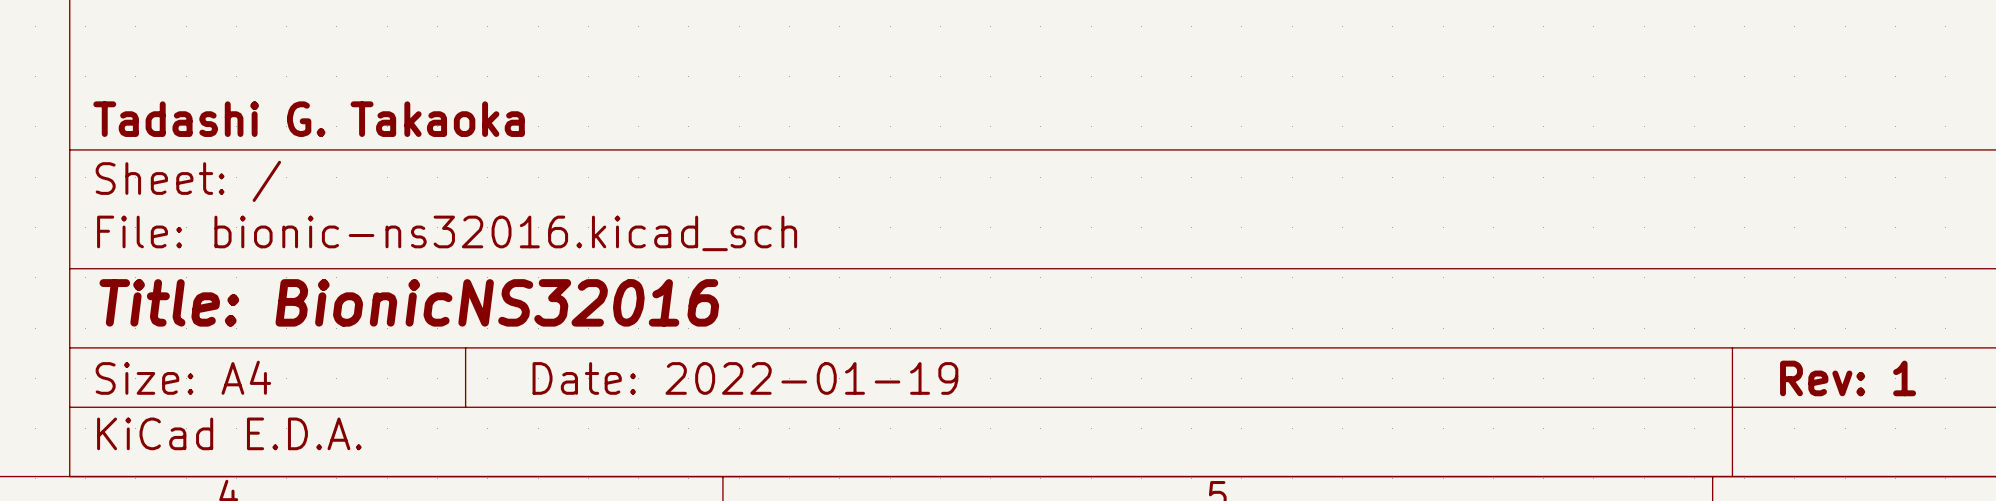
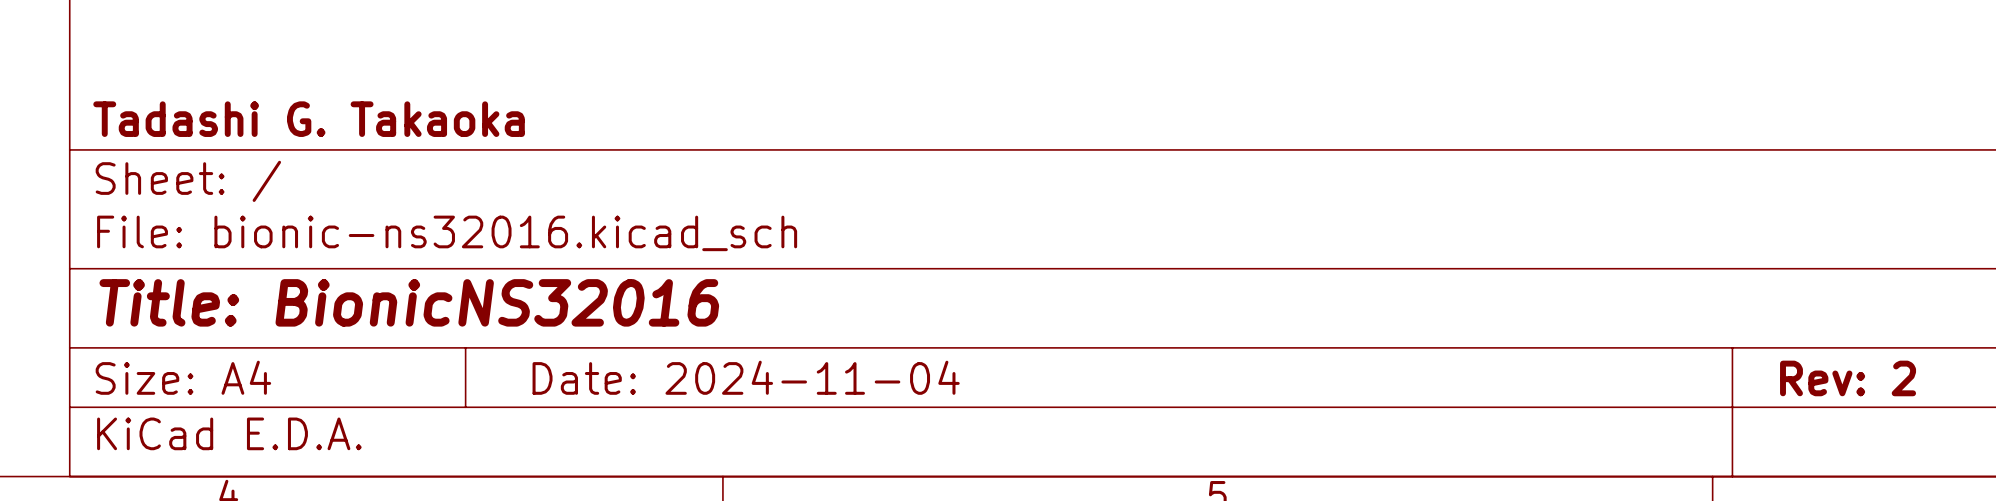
title block: Date: 2022-01-19 (745, 378) -> Date: 2024-11-04 (746, 377)
title block: Rev: 1 (1848, 378) -> Rev: 2 (1848, 378)

